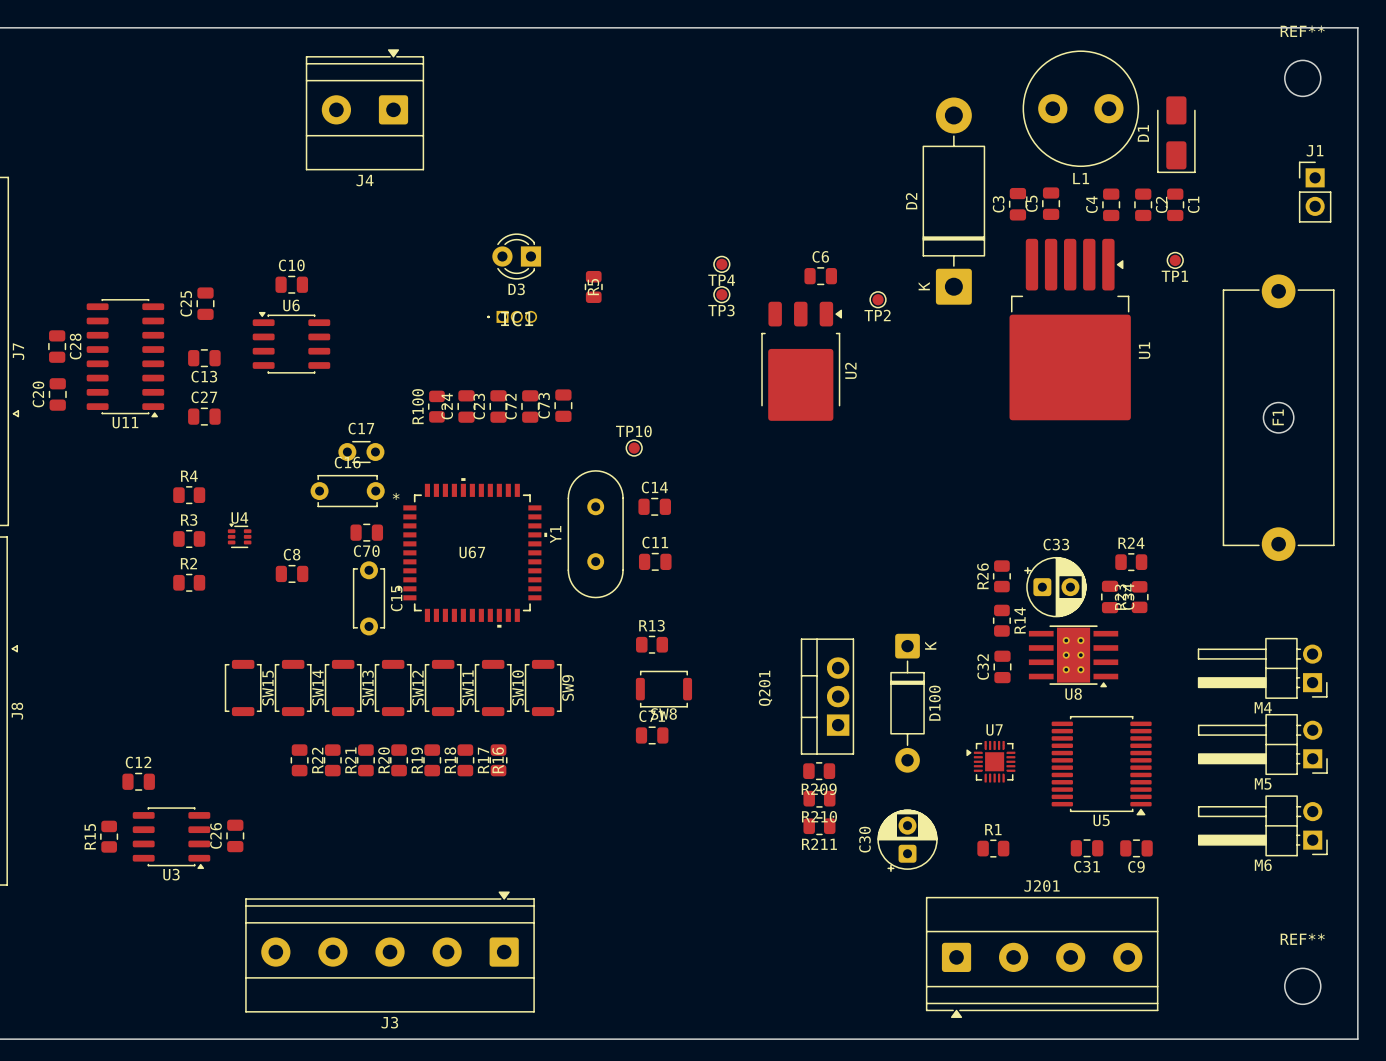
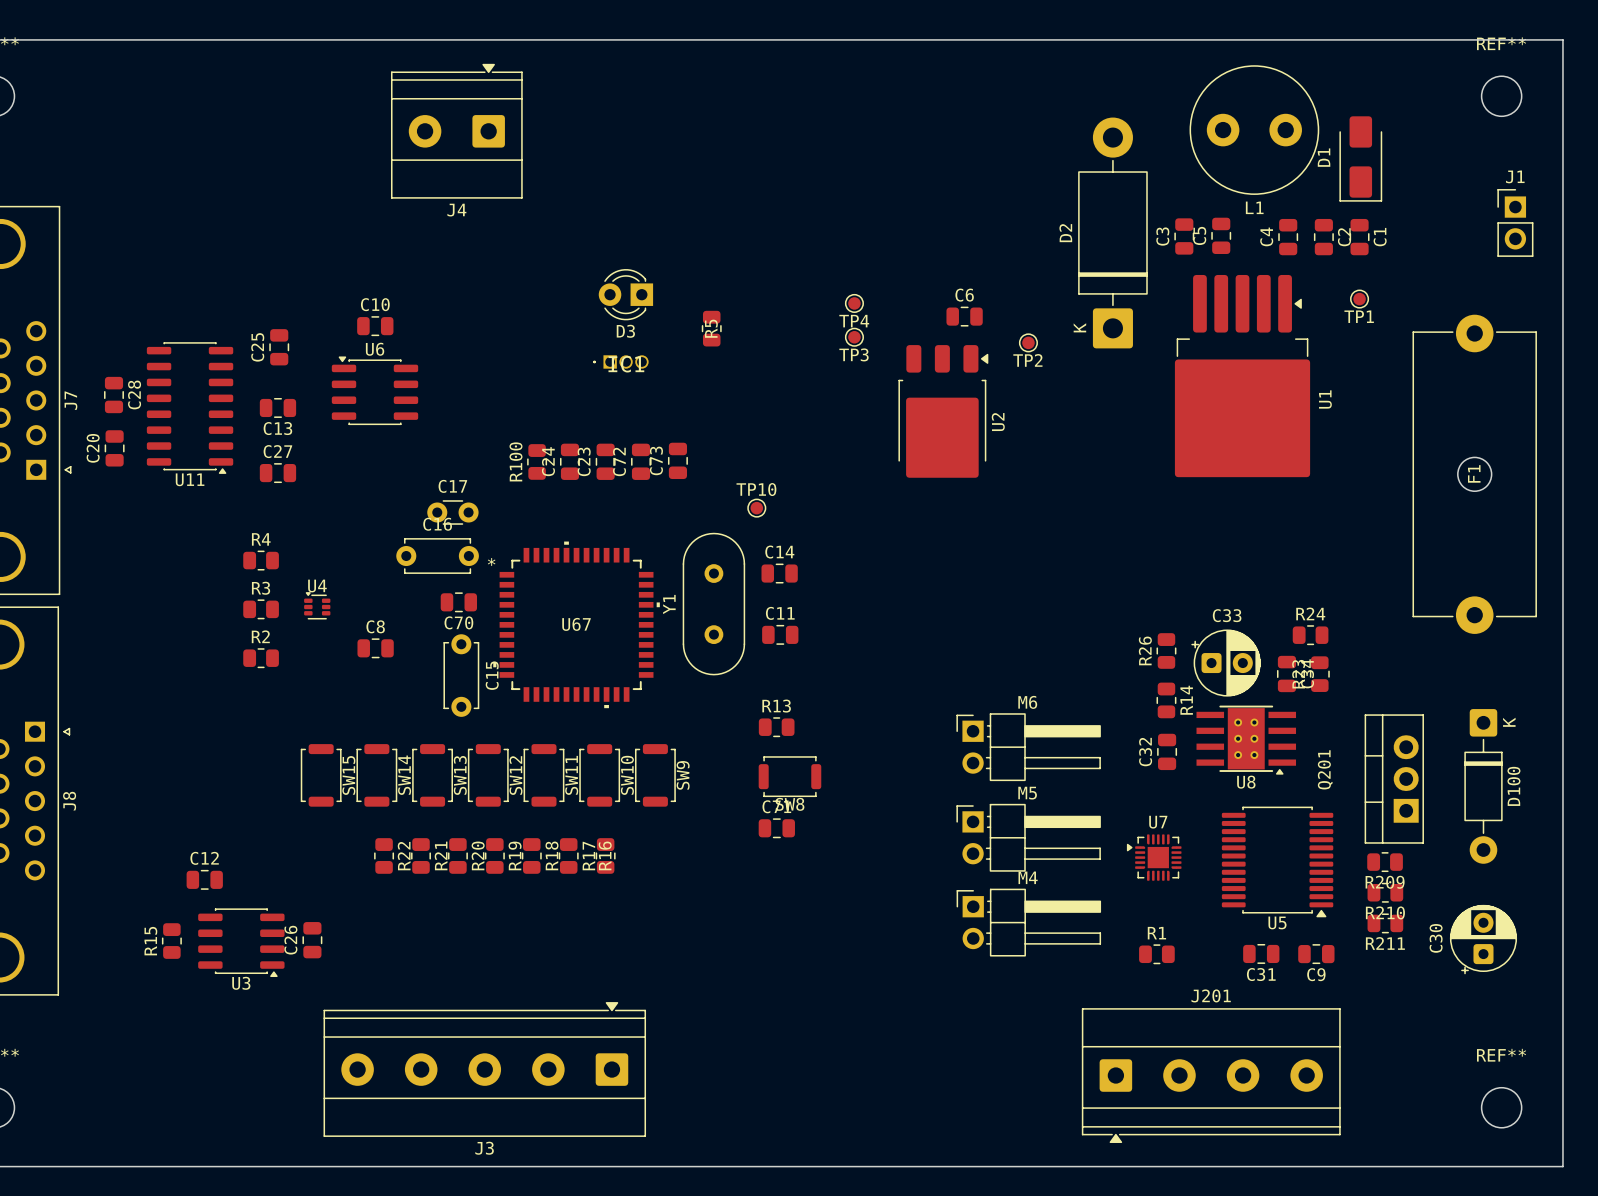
M4 rotation: 0° (1262, 668) -> 180° (1028, 922)
M4 position: (1262, 668) -> (1028, 922)
Q201 position: (827, 696) -> (1394, 779)
D100 position: (907, 703) -> (1483, 786)
M5 rotation: 0° (1262, 744) -> 180° (1028, 837)
M5 position: (1262, 744) -> (1028, 837)
R209 position: (819, 771) -> (1385, 862)
R210 position: (819, 798) -> (1385, 892)
M6 rotation: 0° (1262, 825) -> 180° (1028, 747)
M6 position: (1262, 825) -> (1028, 747)
R211 position: (819, 826) -> (1385, 923)
C30 position: (907, 840) -> (1483, 939)

